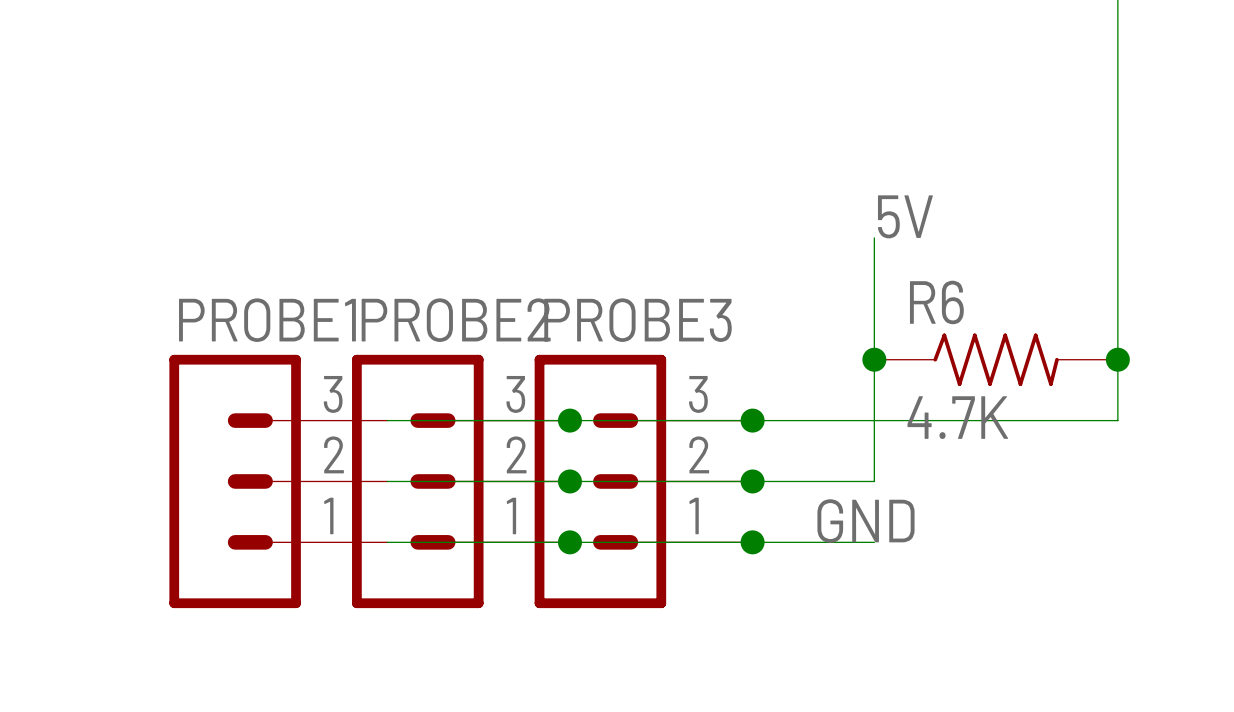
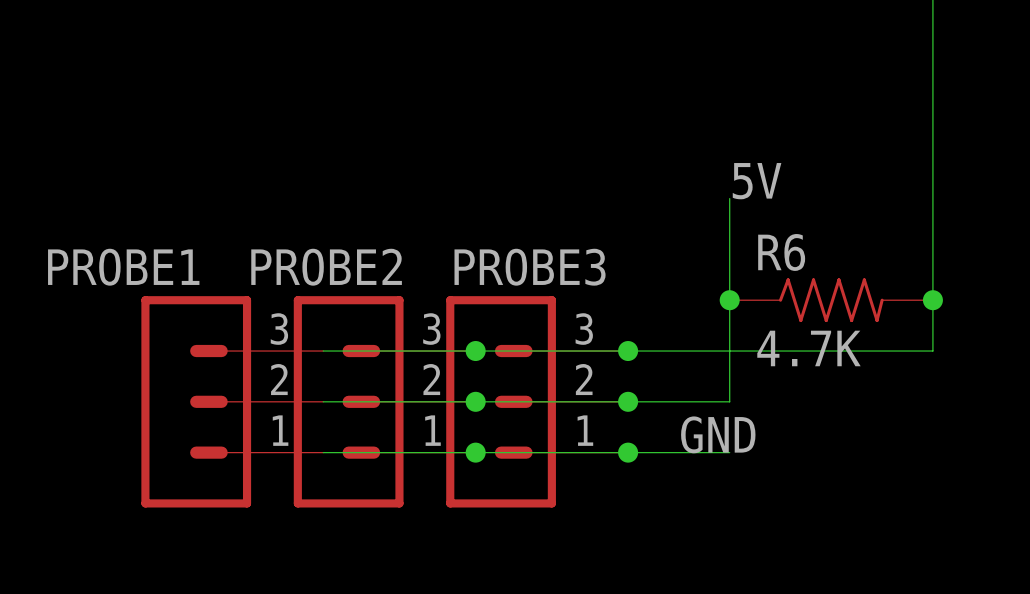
PROBE1 name position: PROBE1 (267, 320) -> PROBE1 (123, 267)
PROBE2 name position: PROBE2 (456, 320) -> PROBE2 (326, 267)

